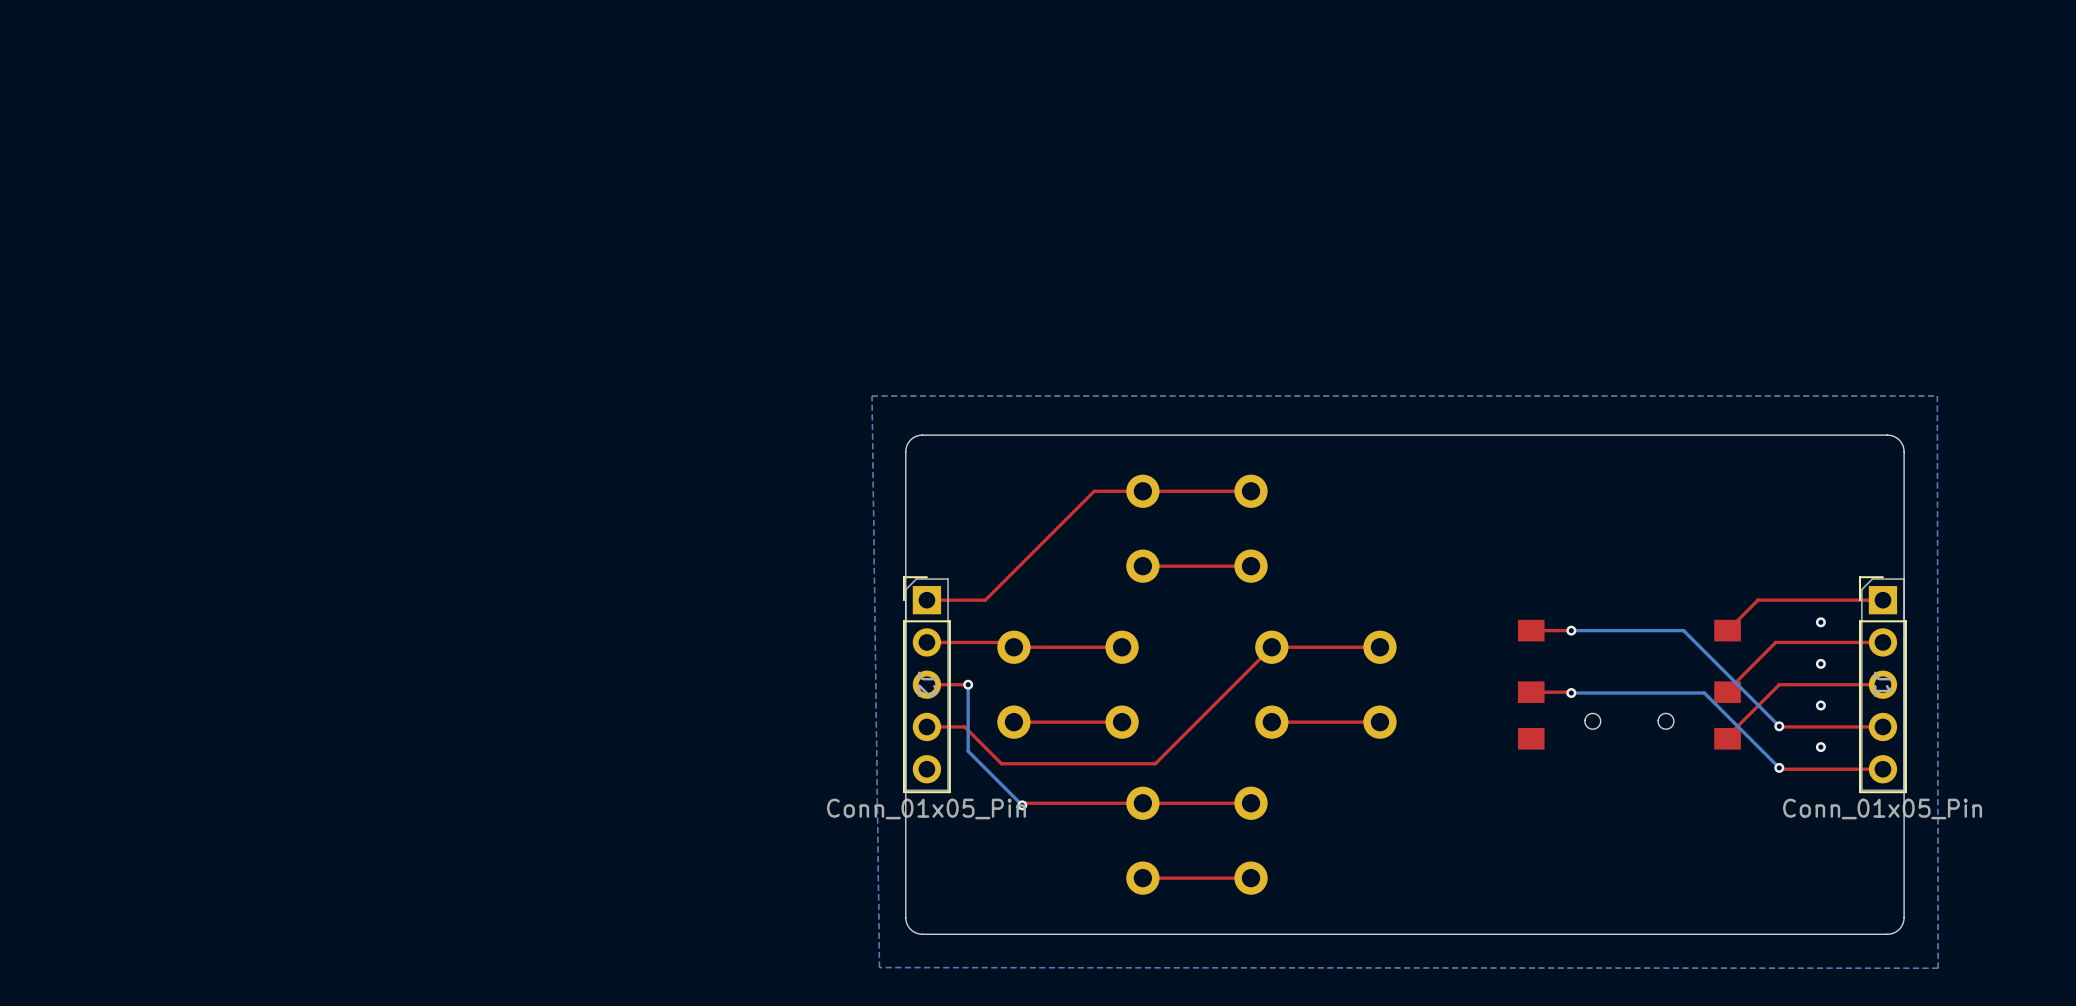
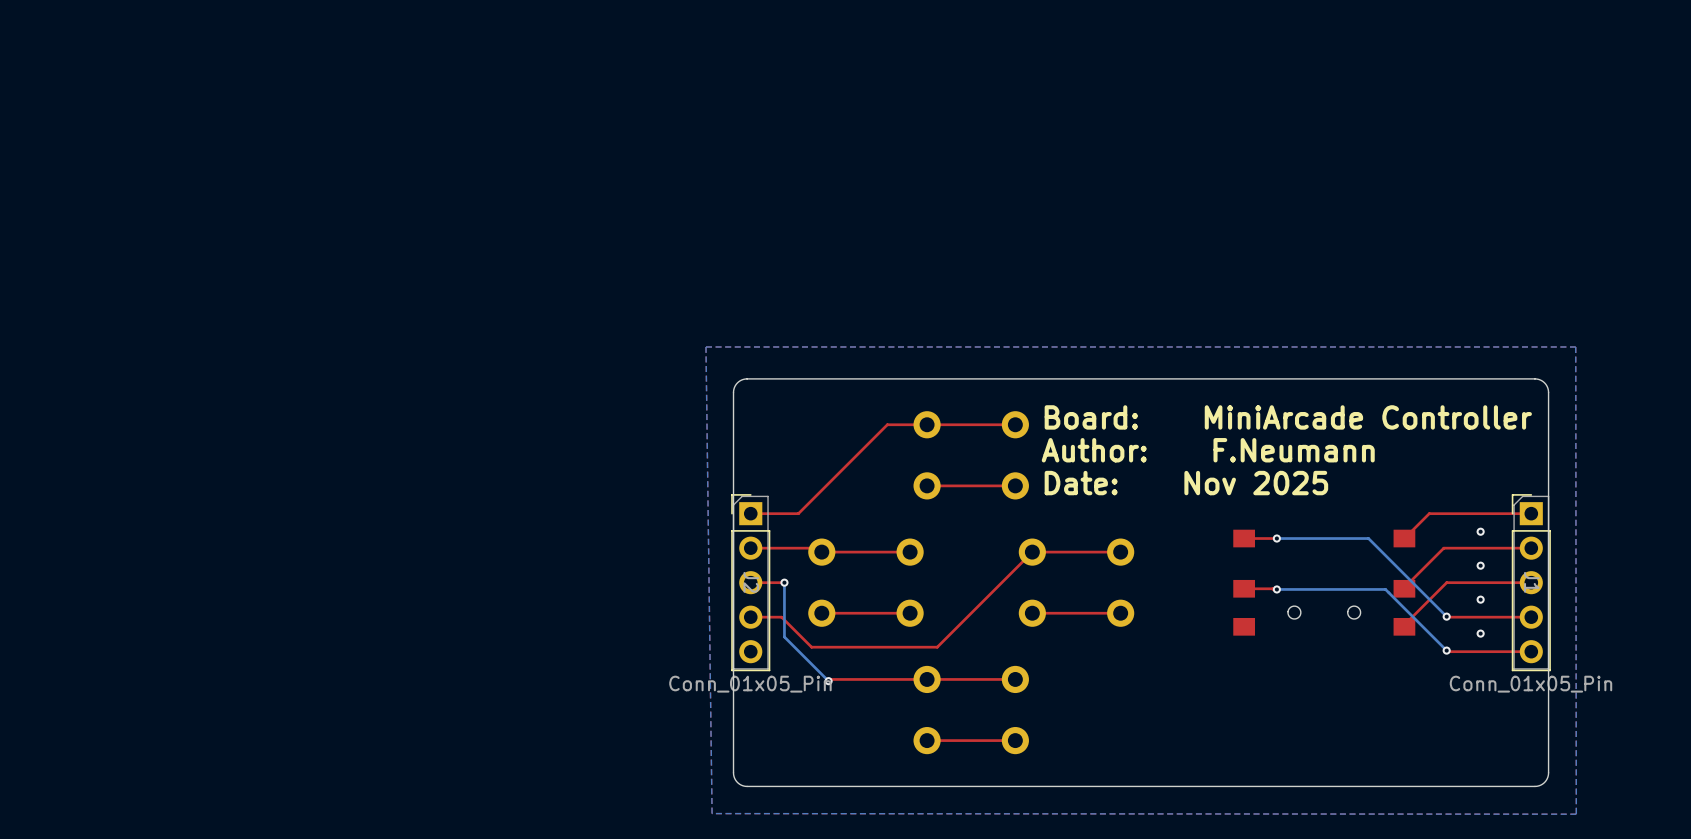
text: none -> Board: MiniArcade Controller (1288, 417)
text: none -> Author: F.Neumann (1208, 450)
text: none -> Date: Nov 2025 (1186, 483)

